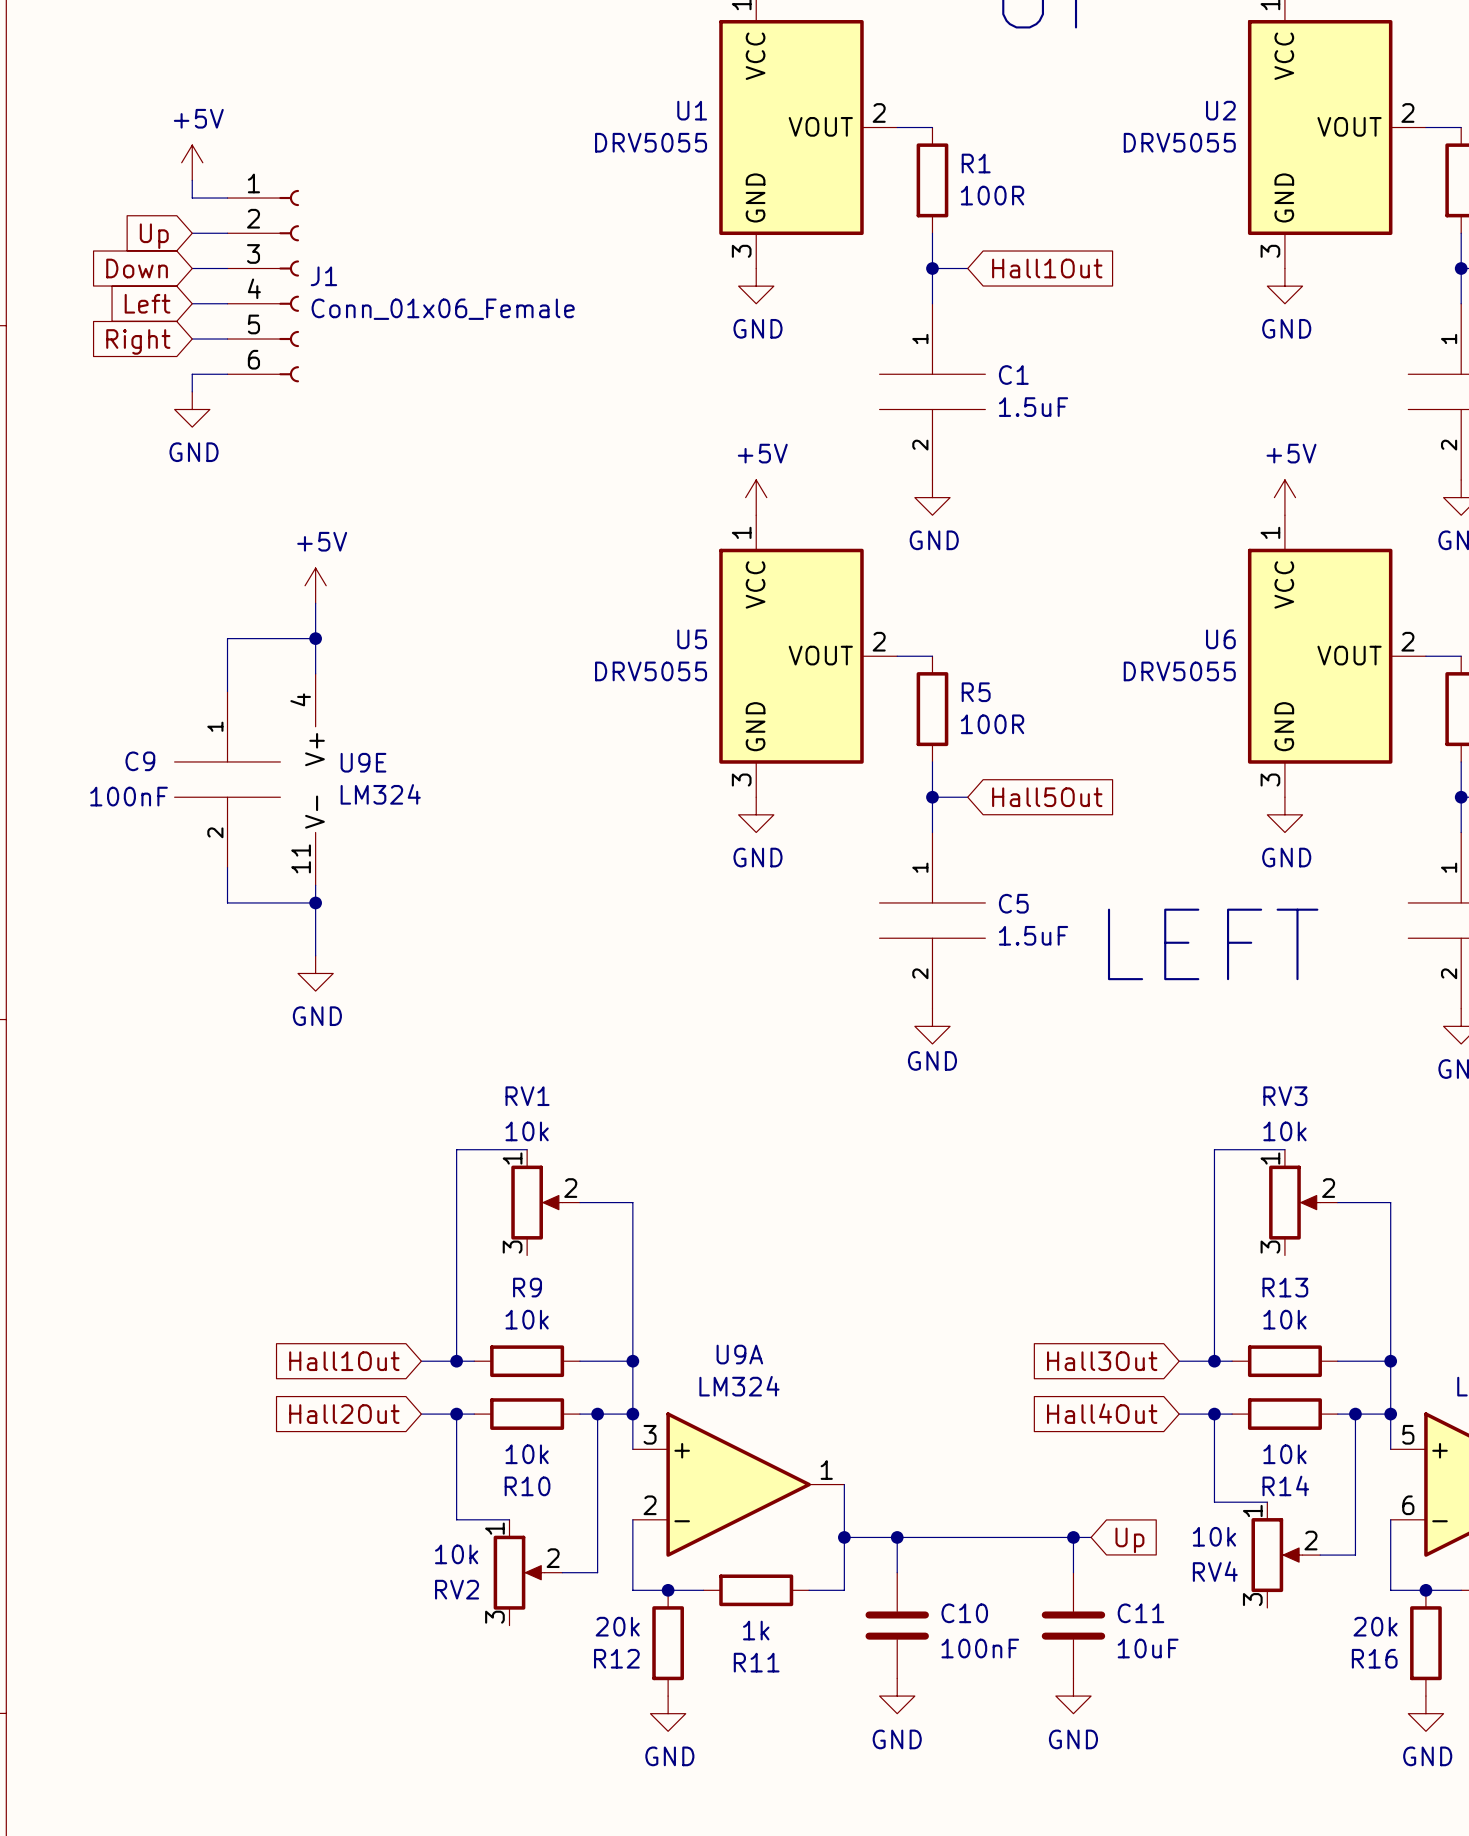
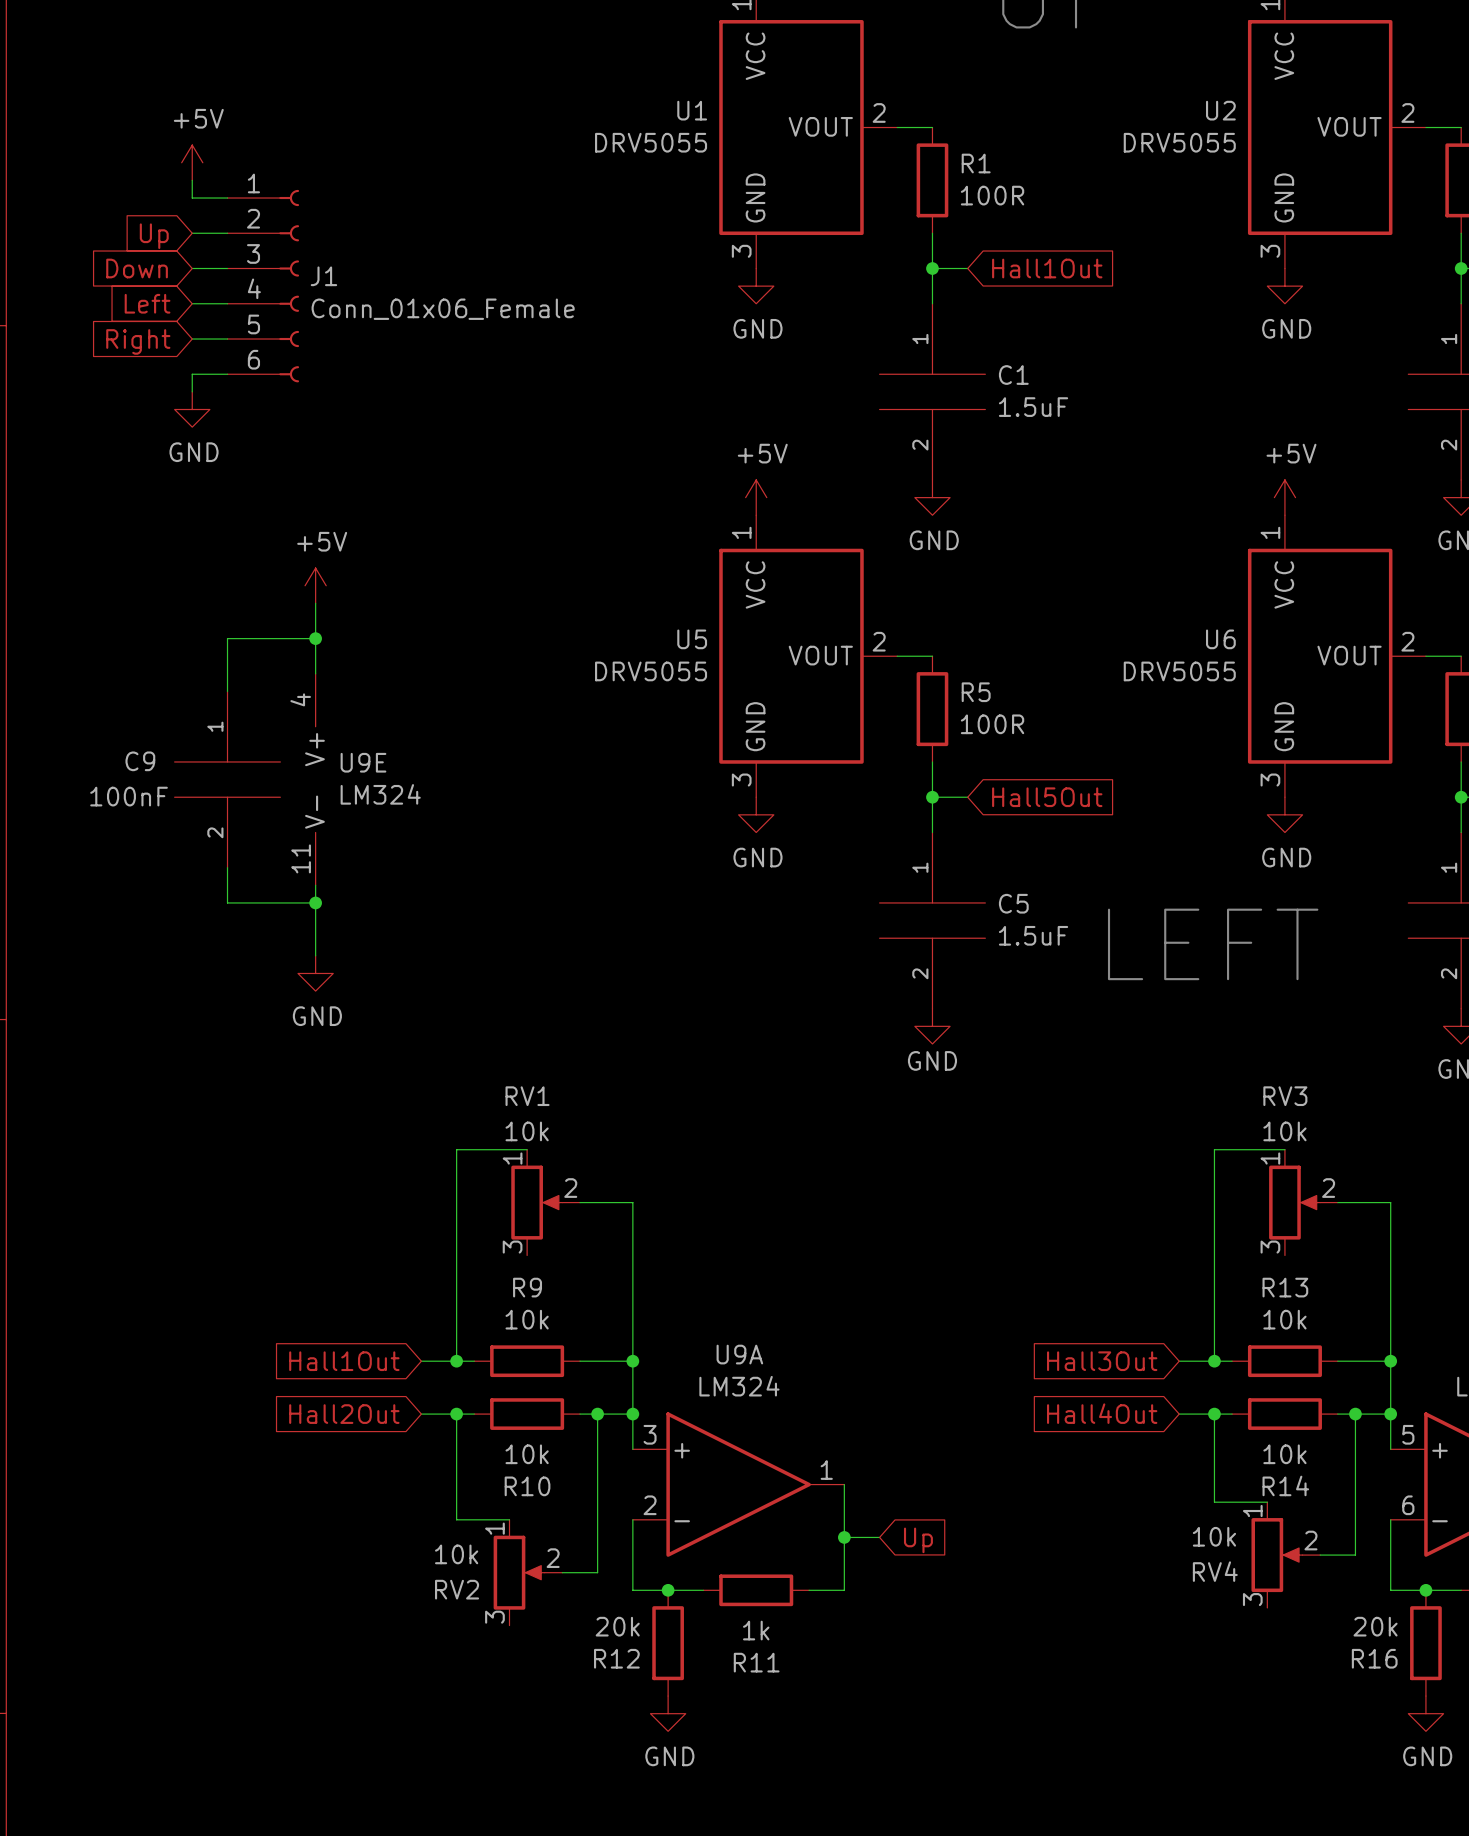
wire: (879, 1537) (1091, 1537) -> none
wire: (897, 1537) (897, 1572) -> none
junction: (897, 1537) -> none
wire: (1073, 1537) (1073, 1572) -> none
junction: (1073, 1537) -> none
global label position: Up (1129, 1540) -> Up (918, 1540)
C10: 100nF (897, 1625) -> none
C11: 10uF (1073, 1625) -> none
power symbol: GND (897, 1696) -> none
power symbol: GND (1073, 1696) -> none

